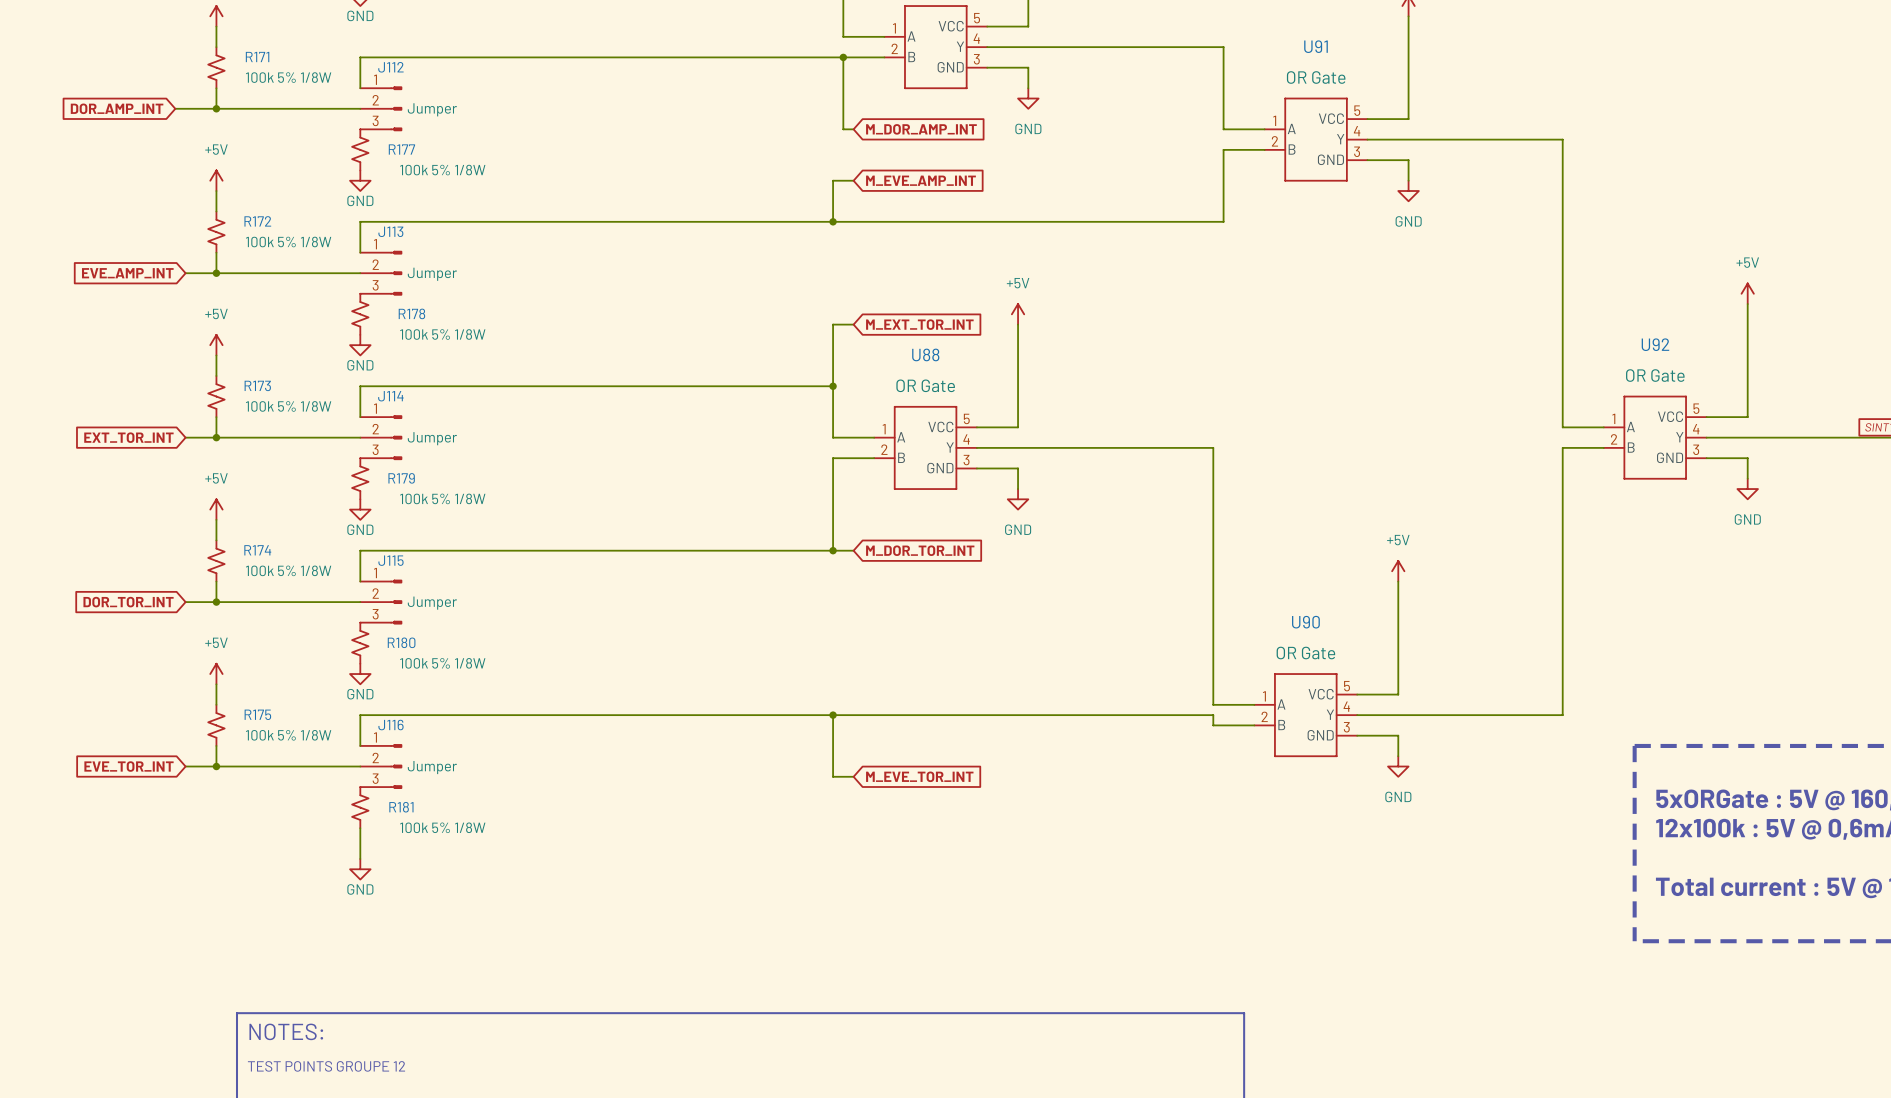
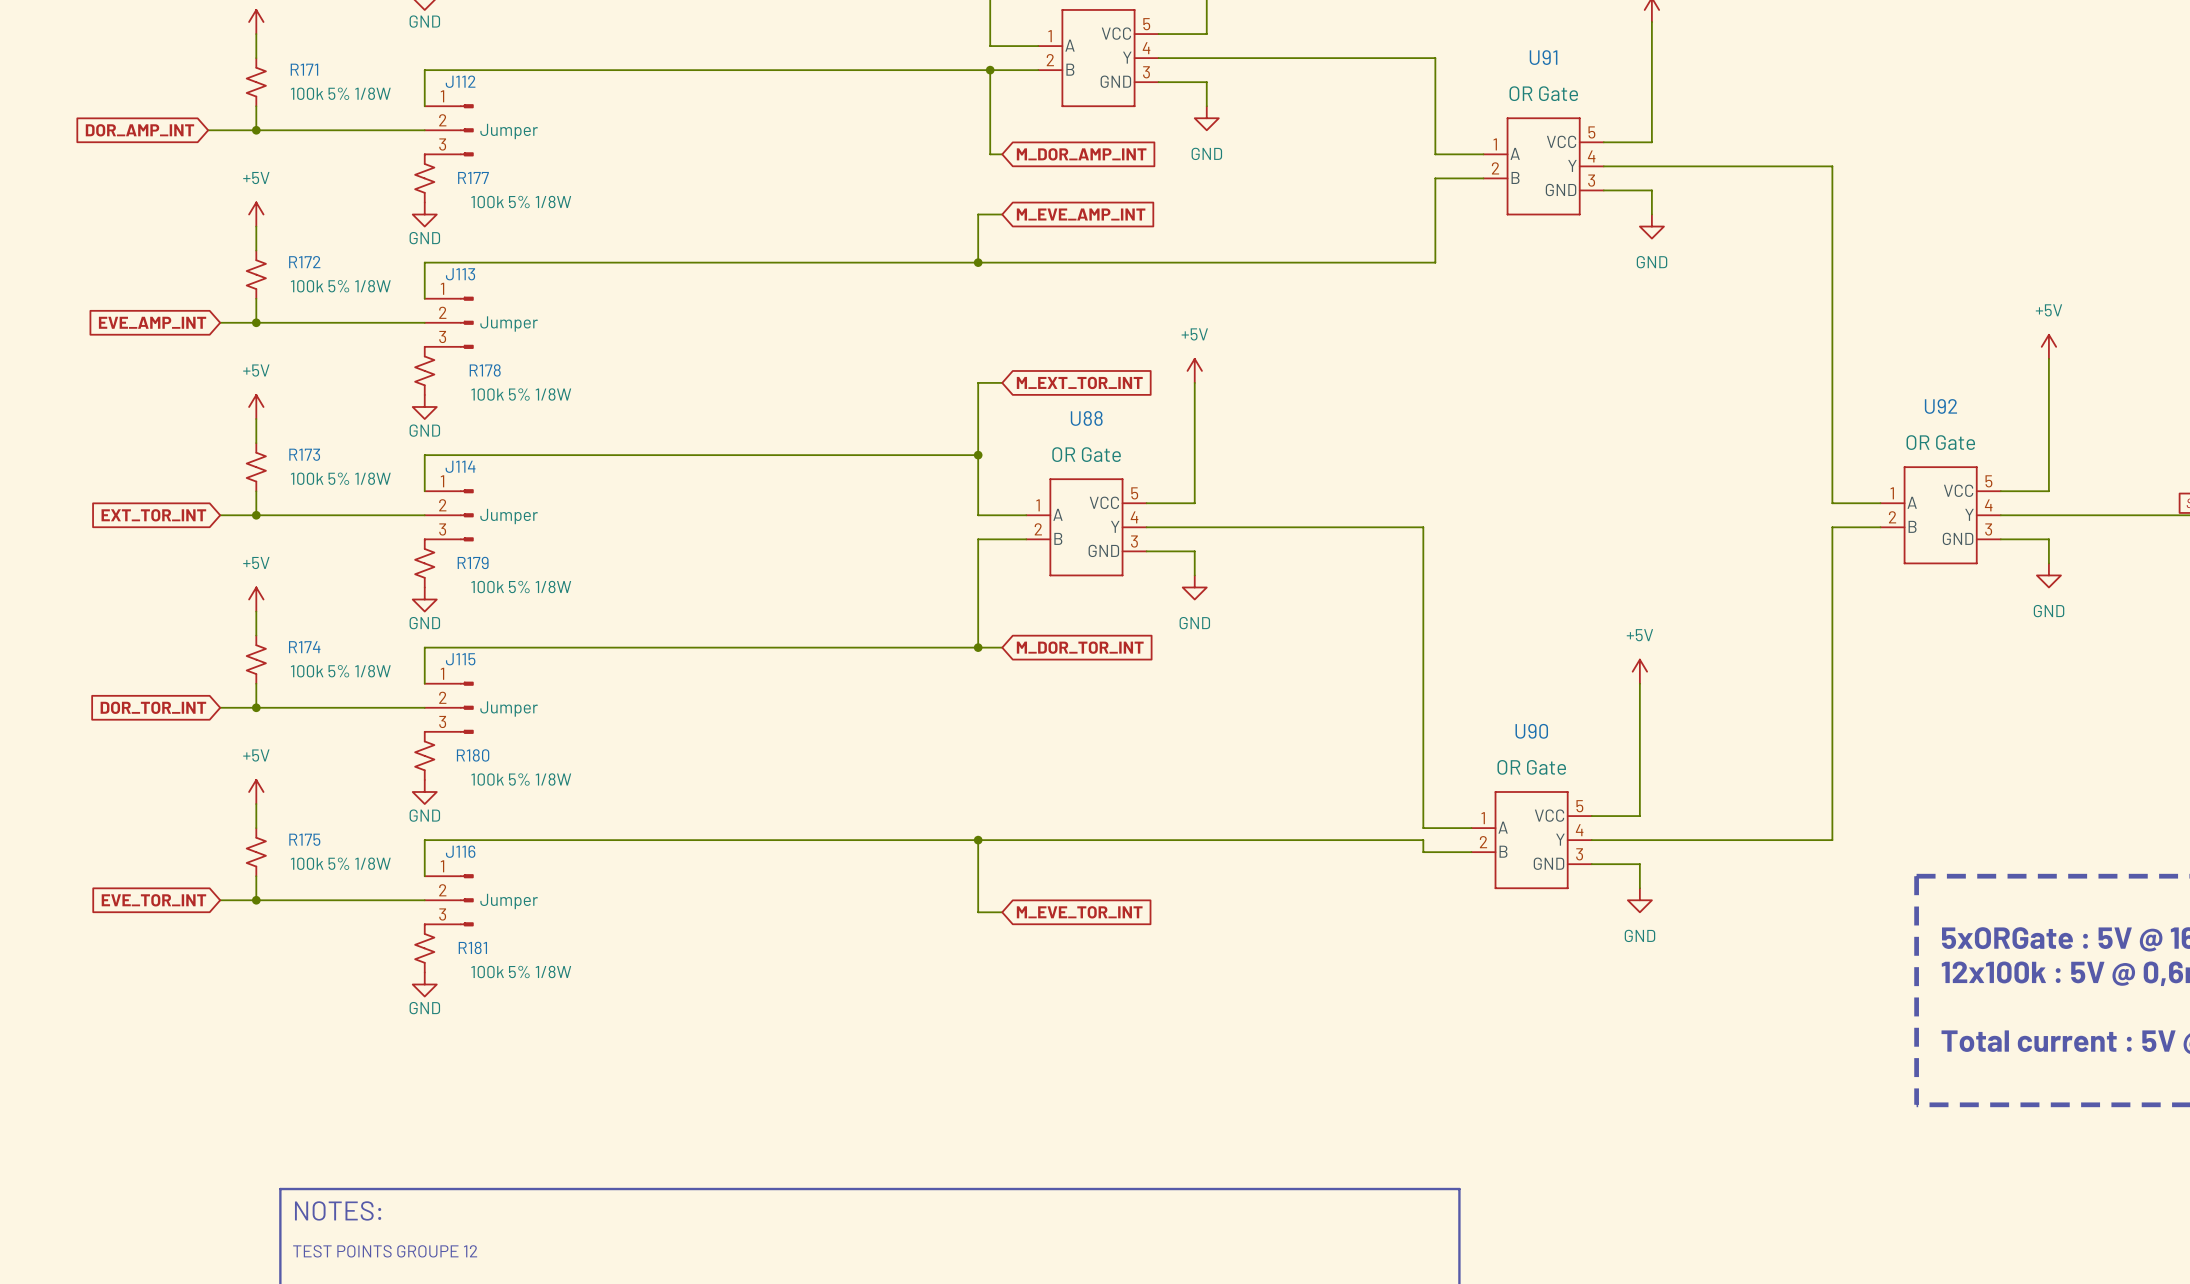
wire: (360, 828) (360, 859) -> none
power symbol position: GND (360, 869) -> GND (424, 984)

